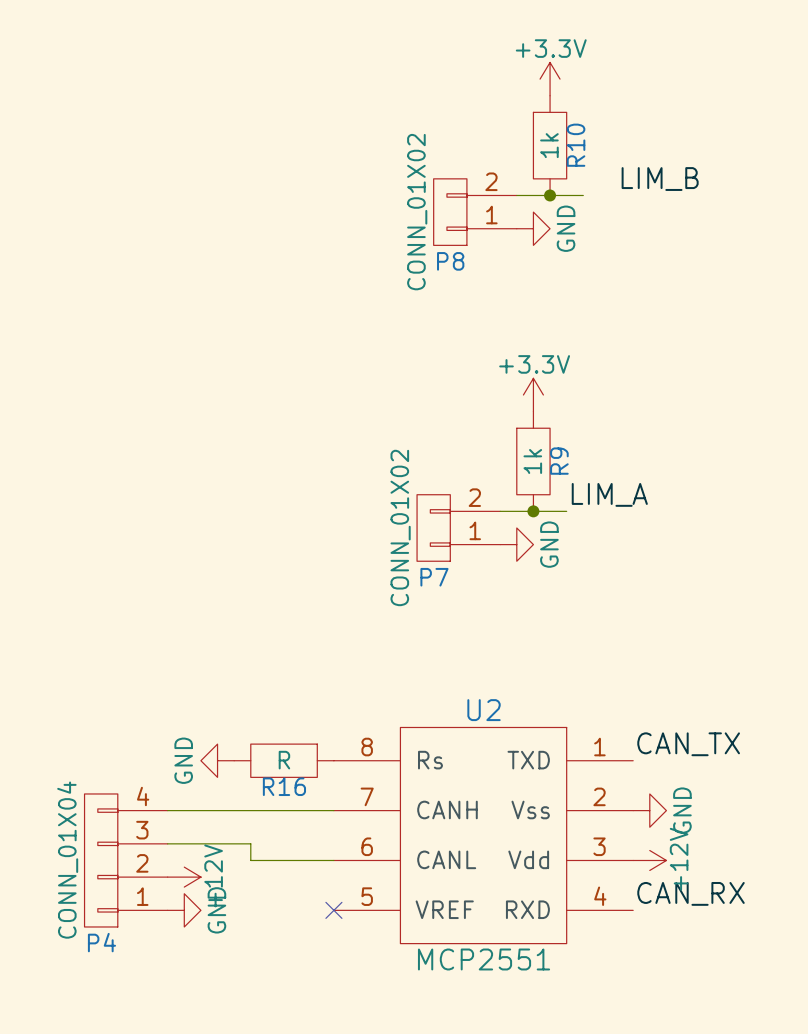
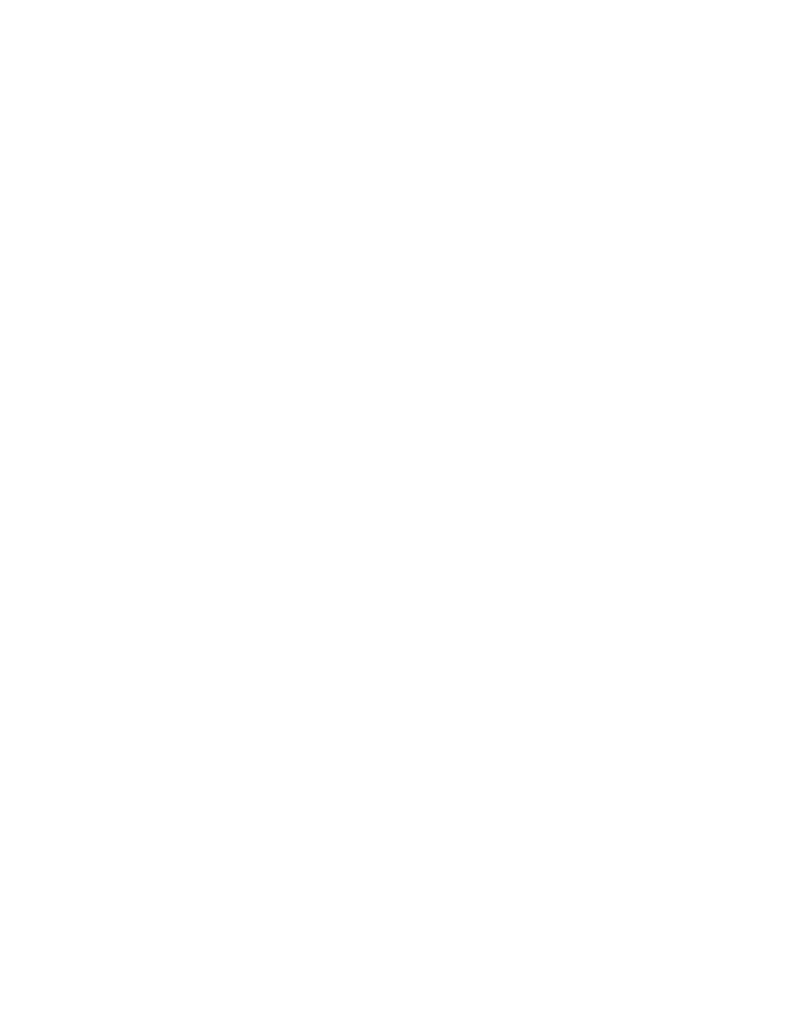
power symbol: +3.3V (550, 79) -> none
R10: 1k (550, 145) -> none
label: LIM_B (660, 179) -> none
wire: (516, 195) (583, 195) -> none
junction: (550, 195) -> none
P8: CONN_01X02 (475, 212) -> none
power symbol: GND (533, 228) -> none
power symbol: +3.3V (533, 394) -> none
R9: 1k (533, 461) -> none
label: LIM_A (609, 494) -> none
wire: (500, 511) (566, 511) -> none
junction: (533, 511) -> none
P7: CONN_01X02 (458, 527) -> none
power symbol: GND (516, 544) -> none
label: CAN_TX (688, 744) -> none
power symbol: GND (217, 760) -> none
R16: R (284, 760) -> none
wire: (167, 810) (333, 810) -> none
power symbol: GND (649, 810) -> none
U2: MCP2551 (483, 835) -> none
wire: (167, 843) (250, 843) (250, 860) (333, 860) -> none
P4: CONN_01X04 (126, 860) -> none
power symbol: +12V (649, 860) -> none
power symbol: +12V (184, 877) -> none
label: CAN_RX (691, 893) -> none
power symbol: GND (184, 910) -> none
no-connect mark: (333, 910) -> none

